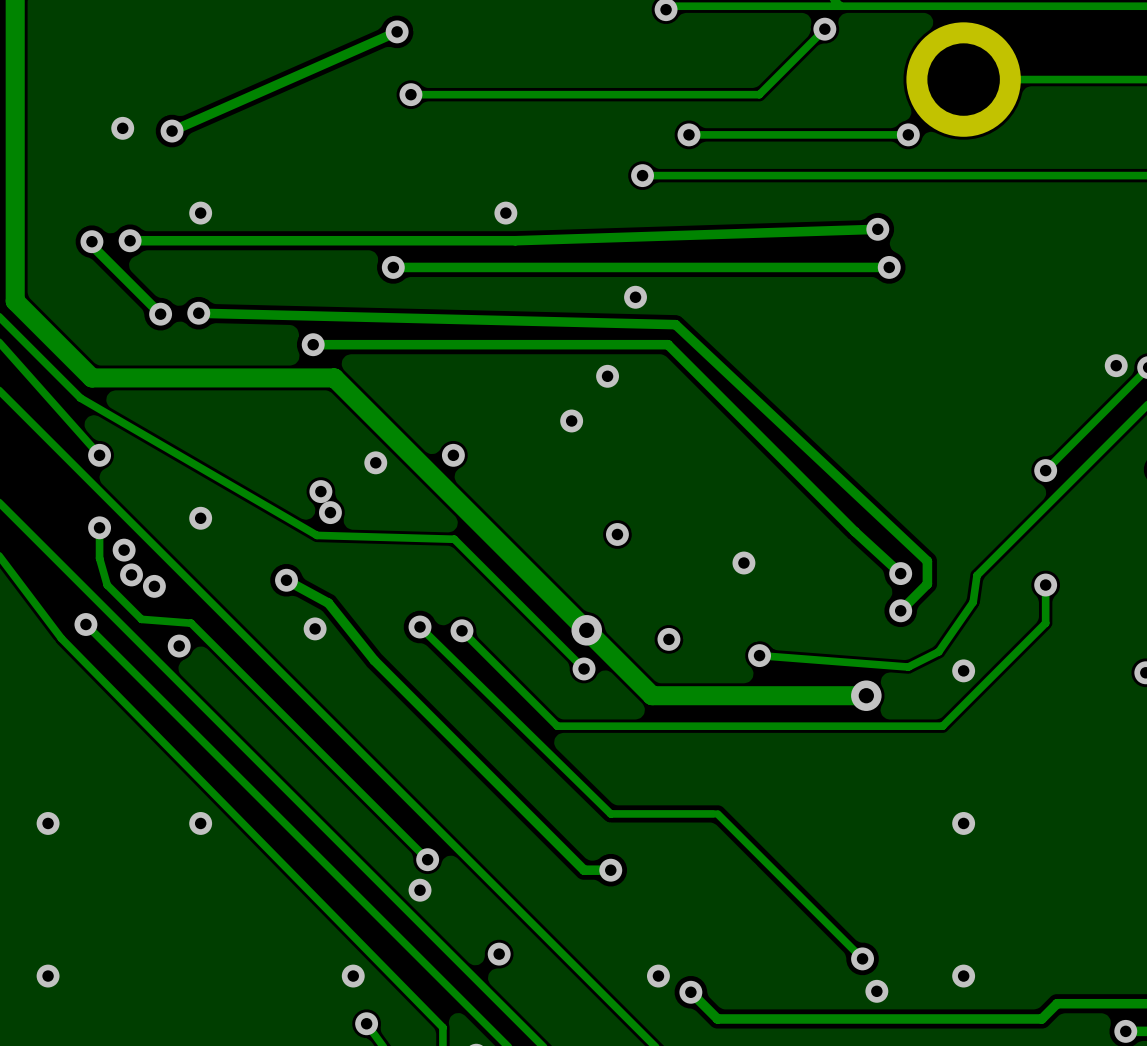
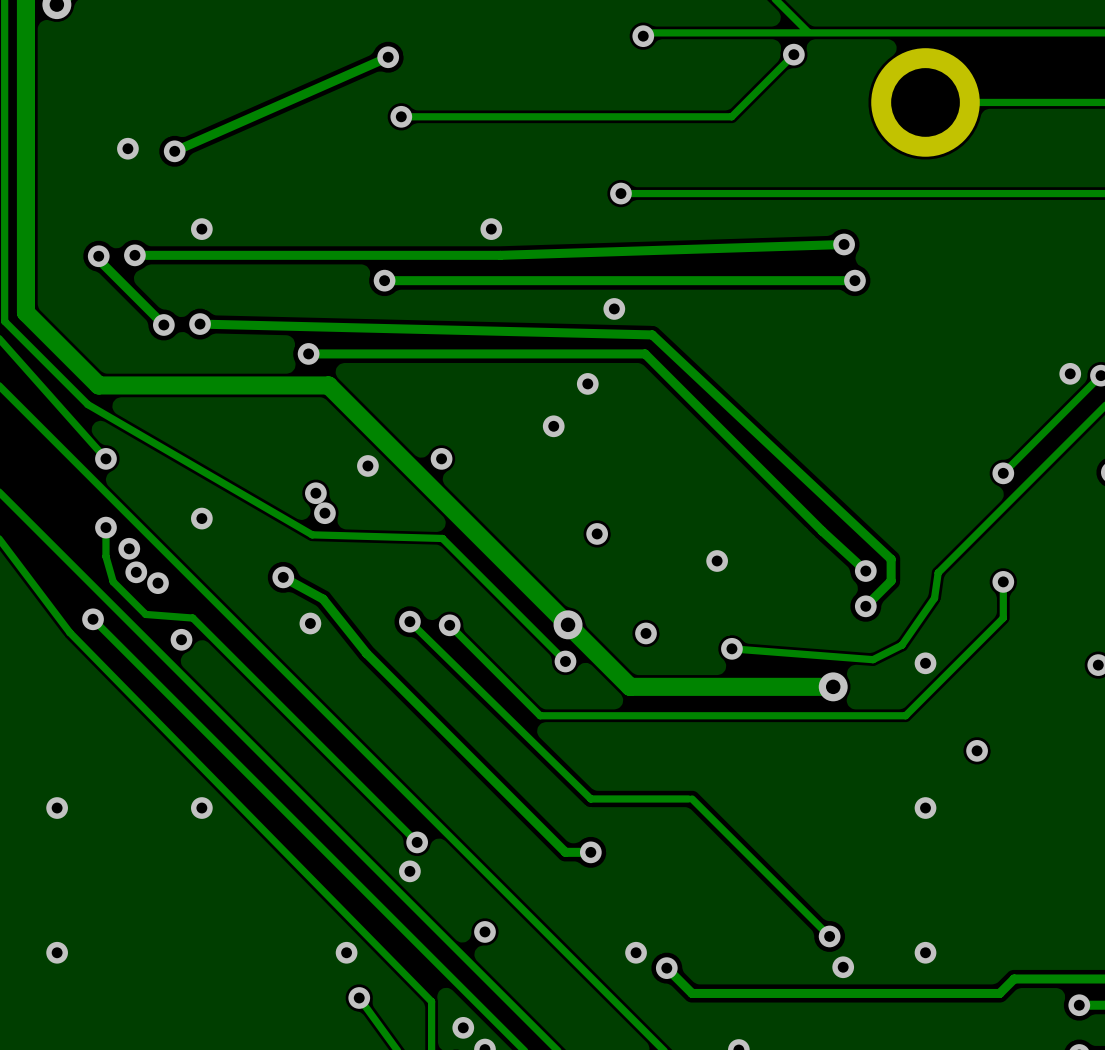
via: (688, 134) -> none
track: (908, 134) (688, 134) -> none
via: (908, 134) -> none
via: none -> (977, 750)

